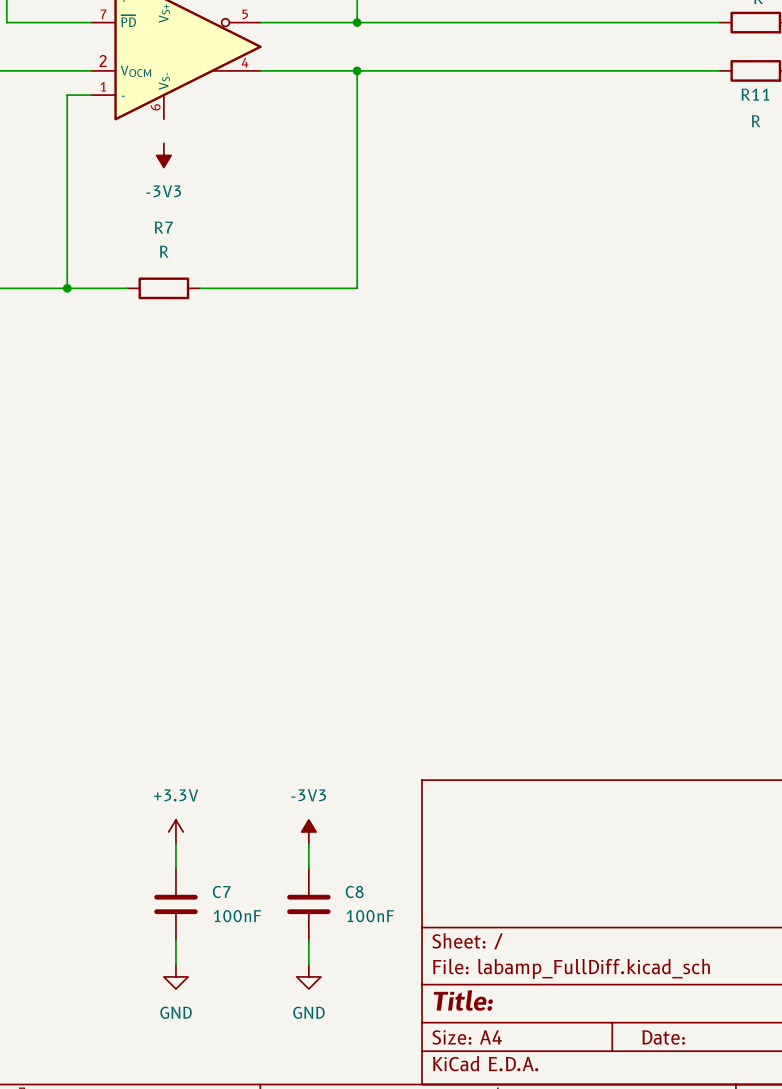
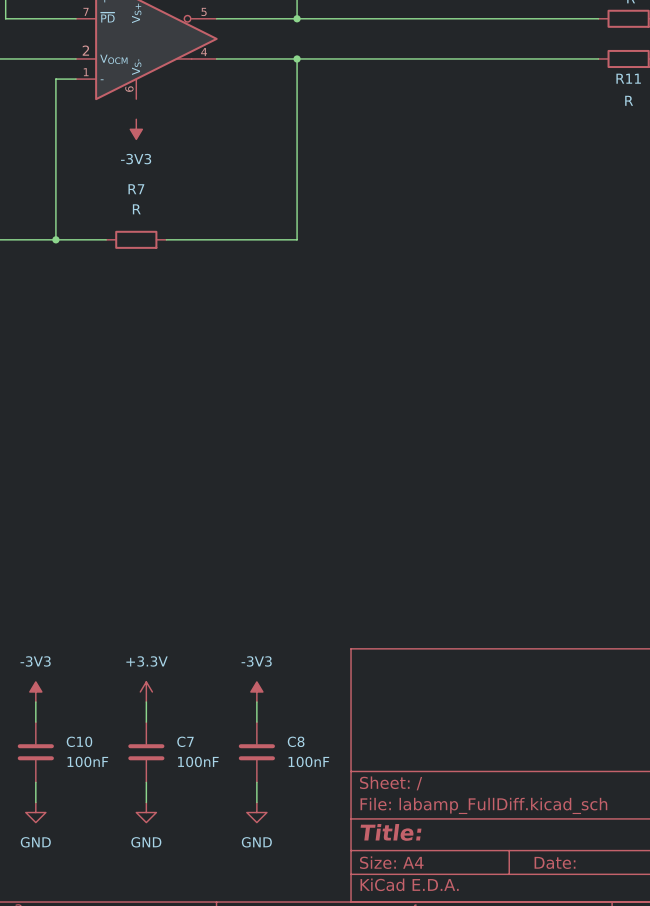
power symbol: none -> -3V3 (35, 691)
wire: none -> (35, 702) (35, 722)
C10: none -> 100nF (35, 752)
wire: none -> (35, 782) (35, 802)
power symbol: none -> GND (35, 812)

